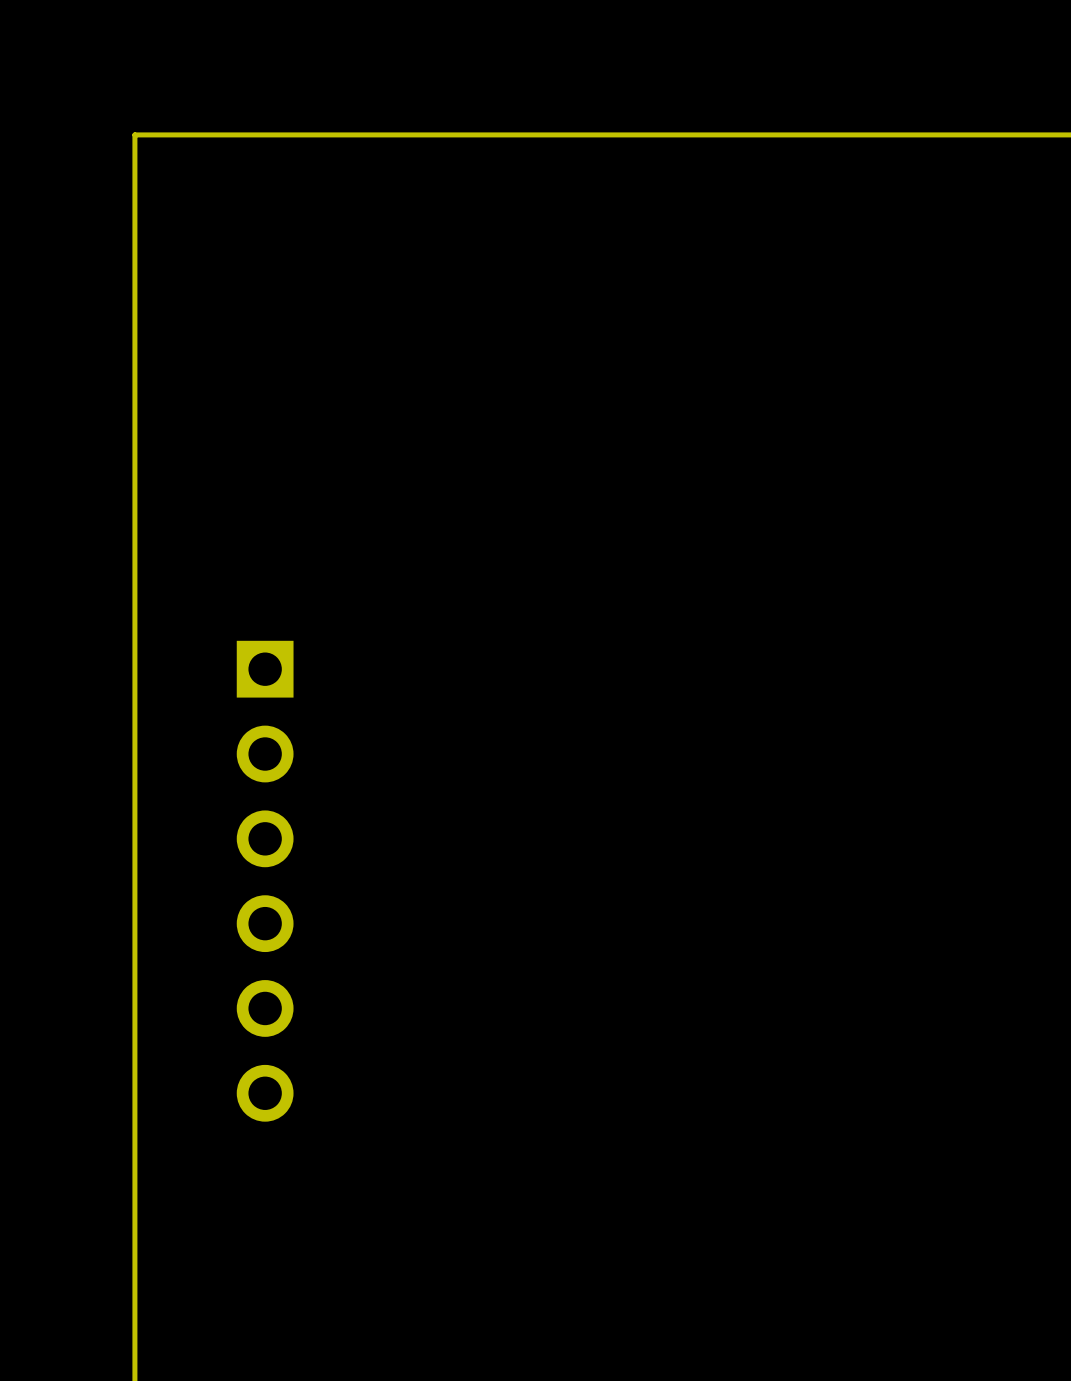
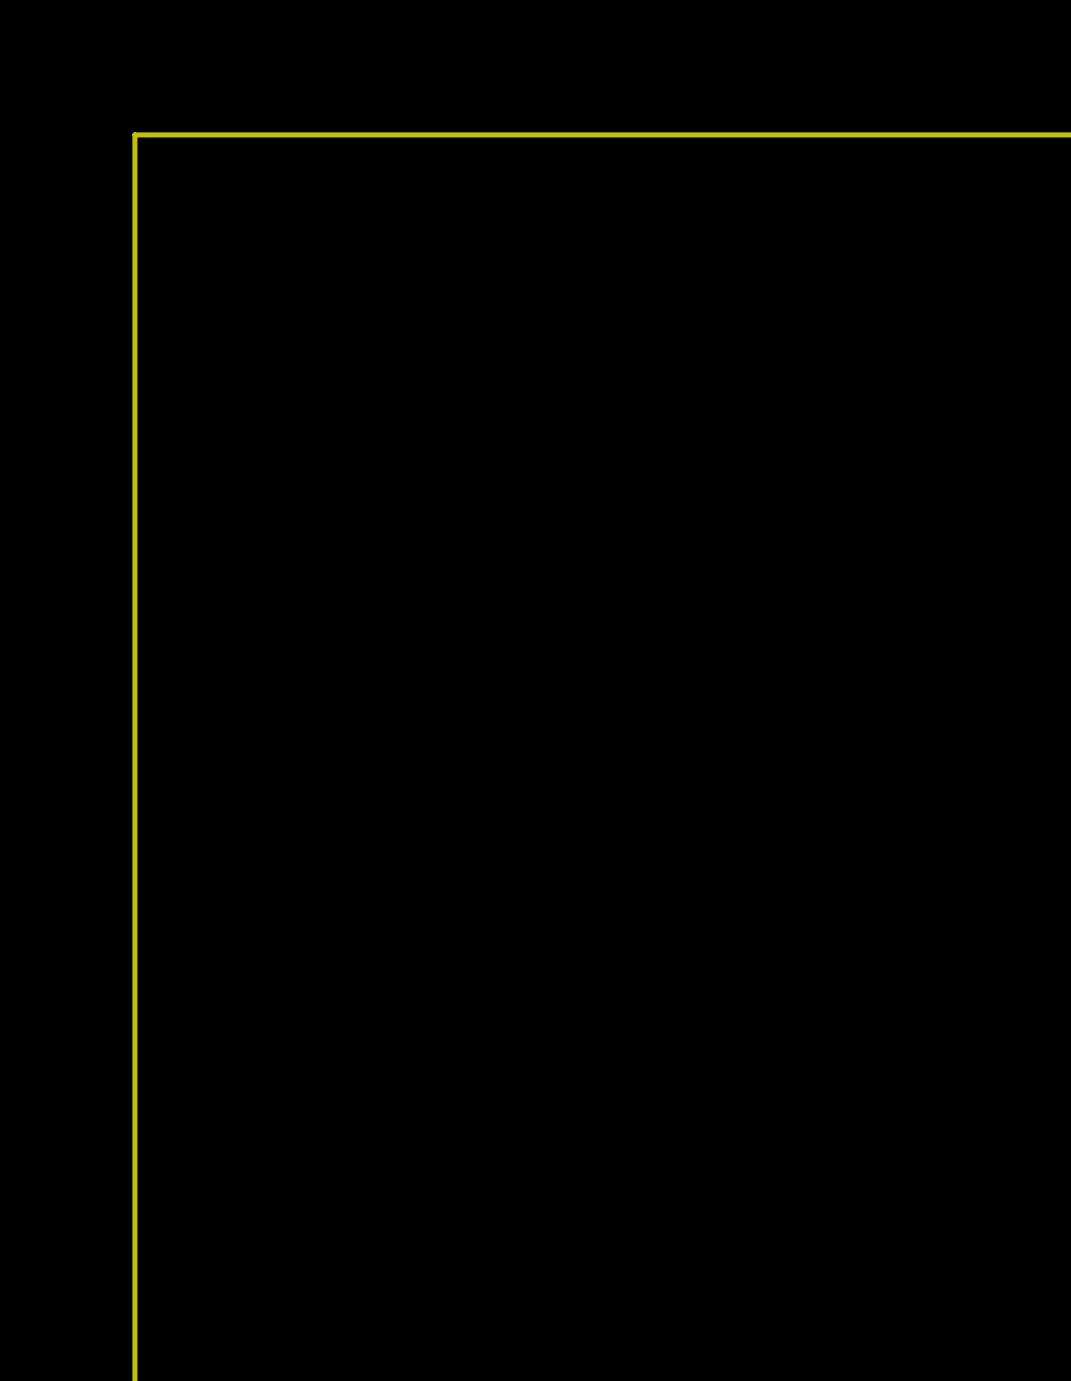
part: (265, 881) -> none

